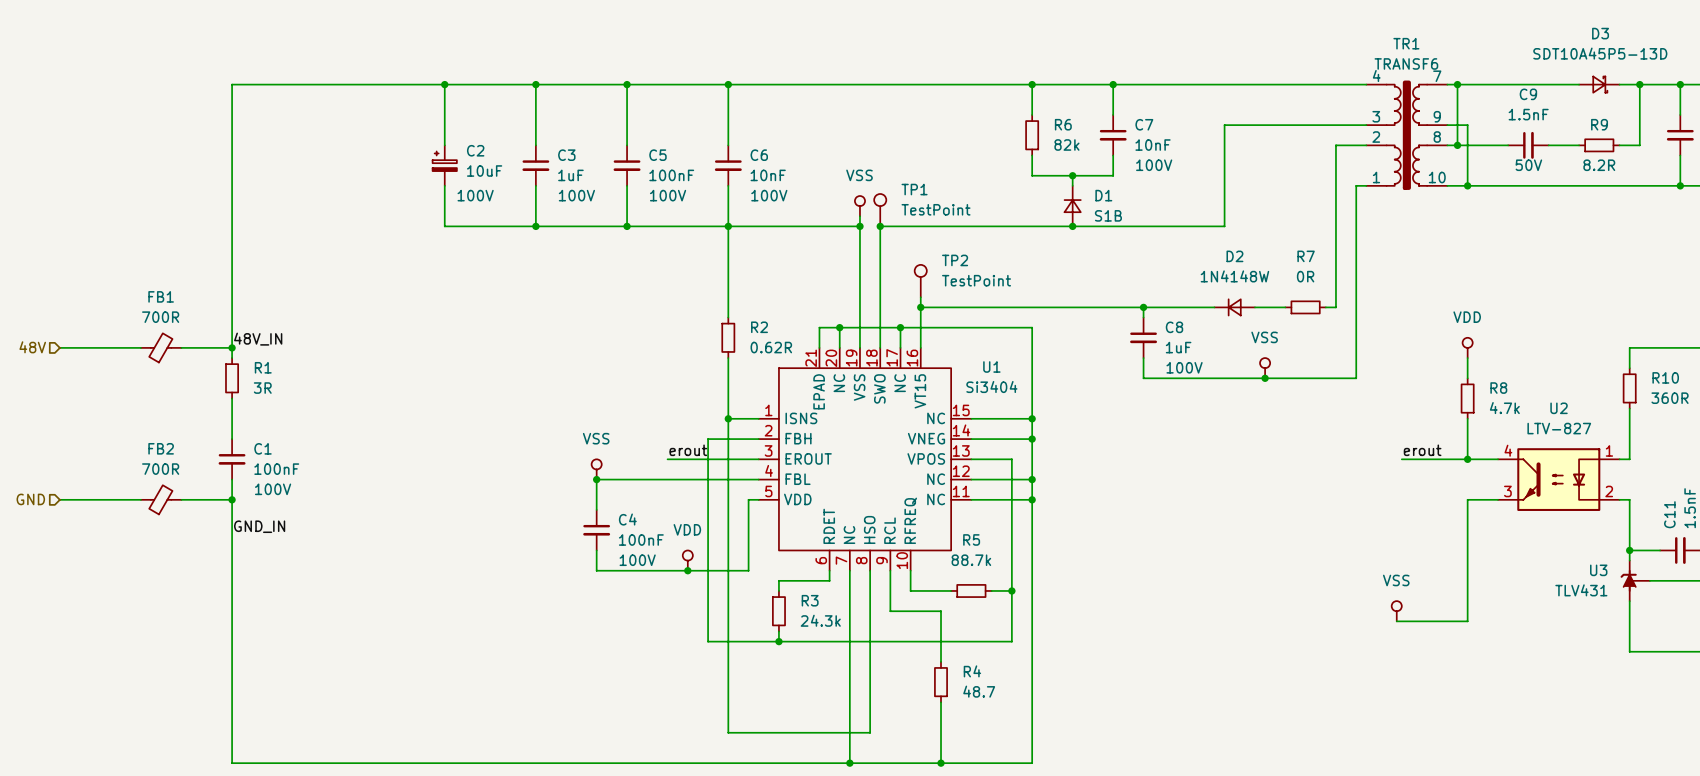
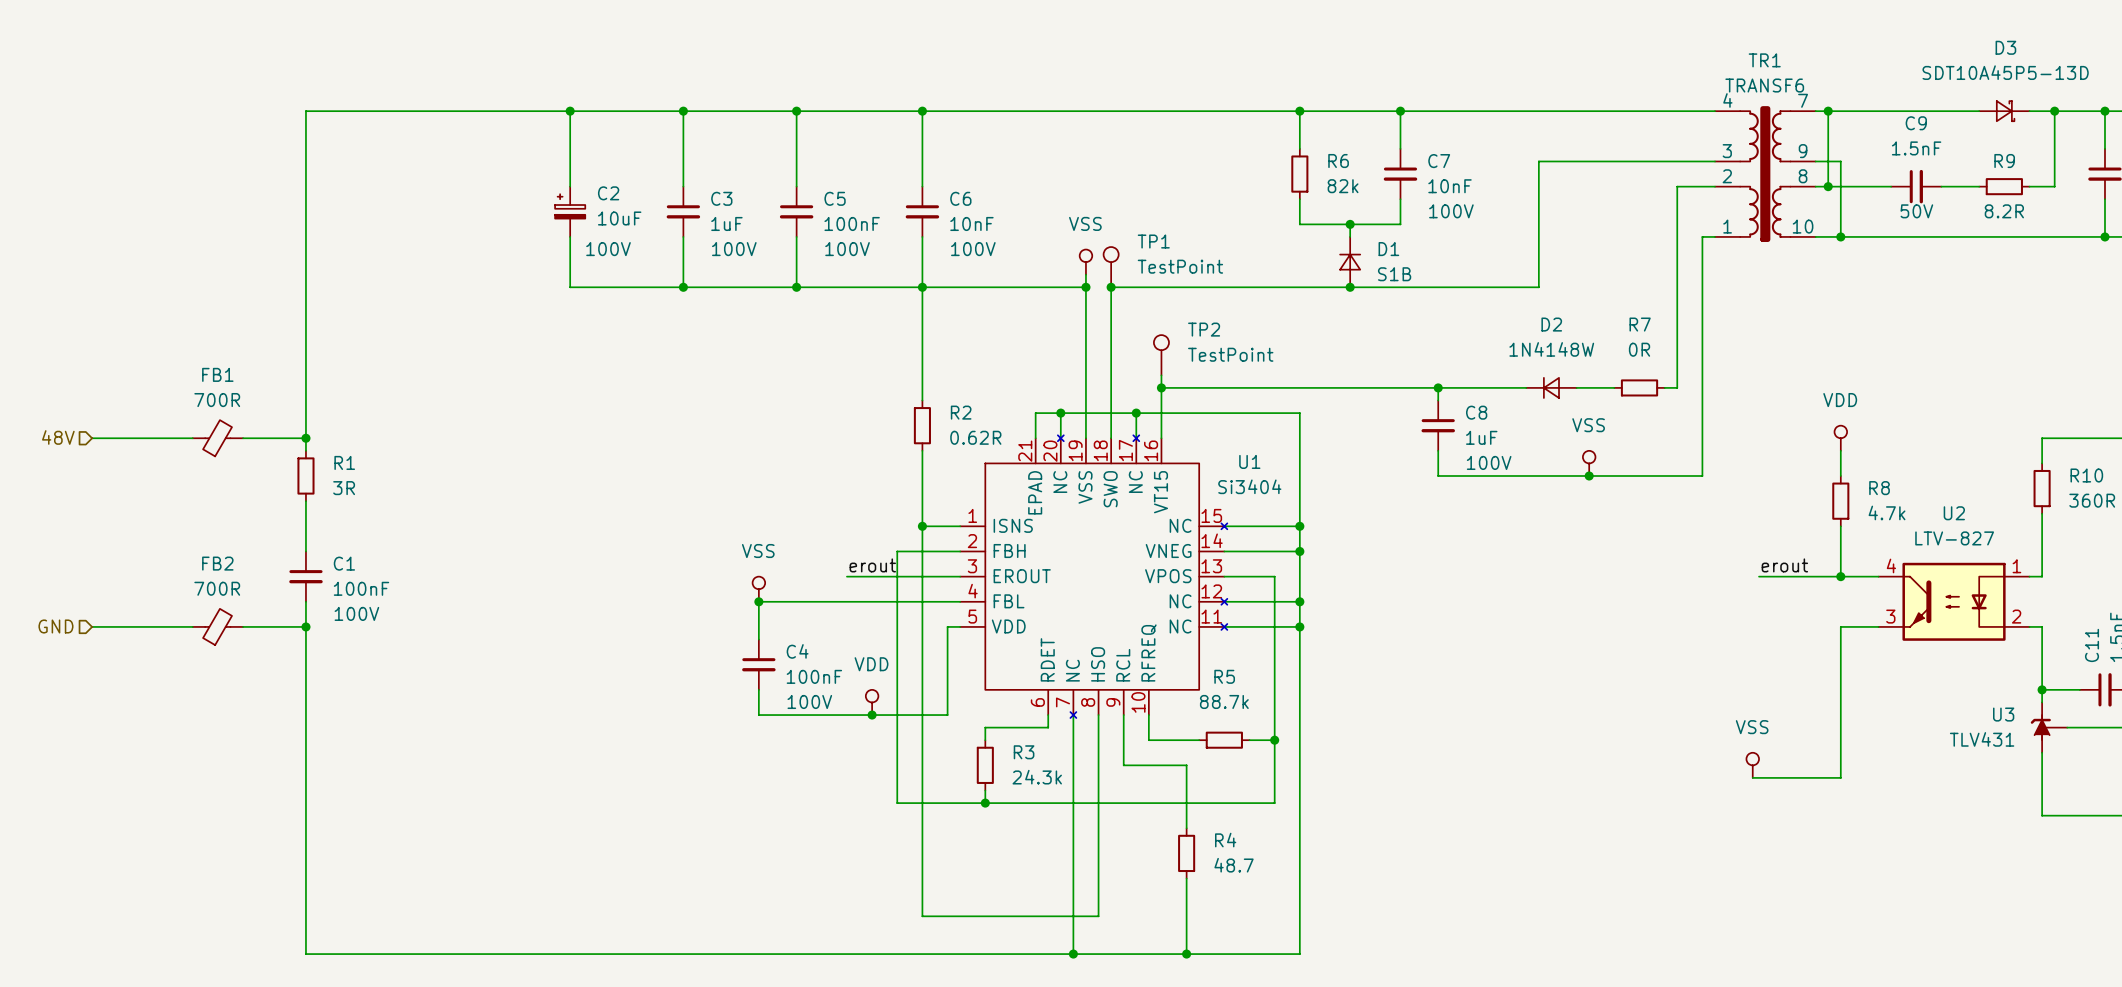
label: 48V_IN (258, 339) -> none
U1 symbol: [758, 347, 972, 571] -> [960, 435, 1228, 719]
label: GND_IN (259, 526) -> none

